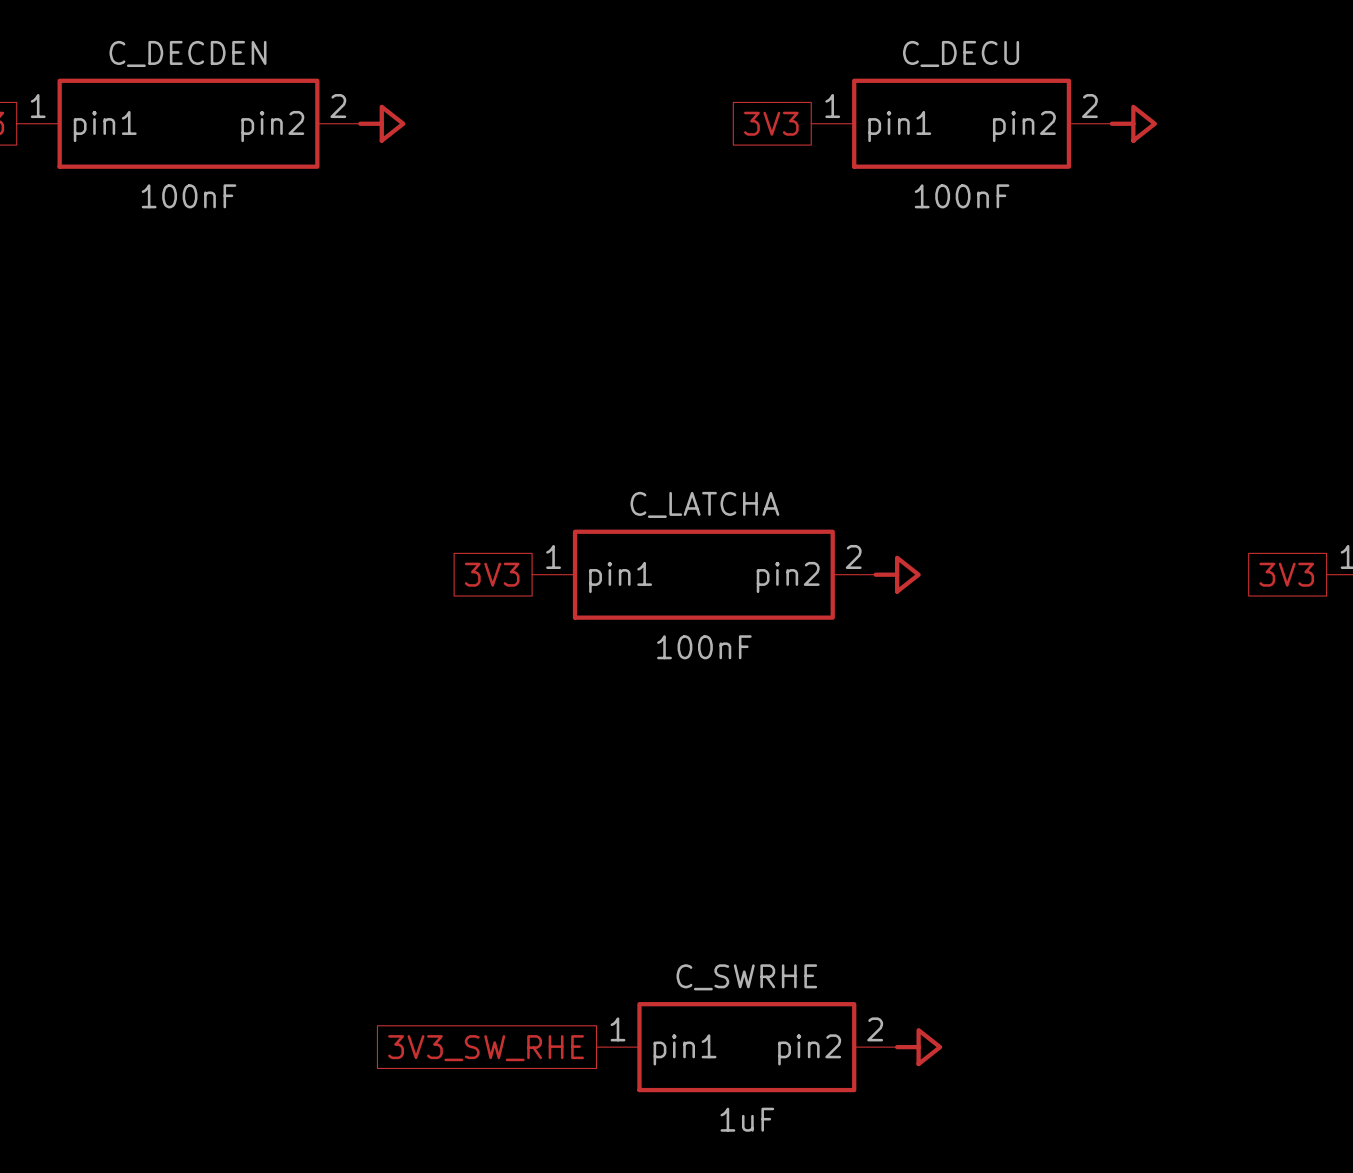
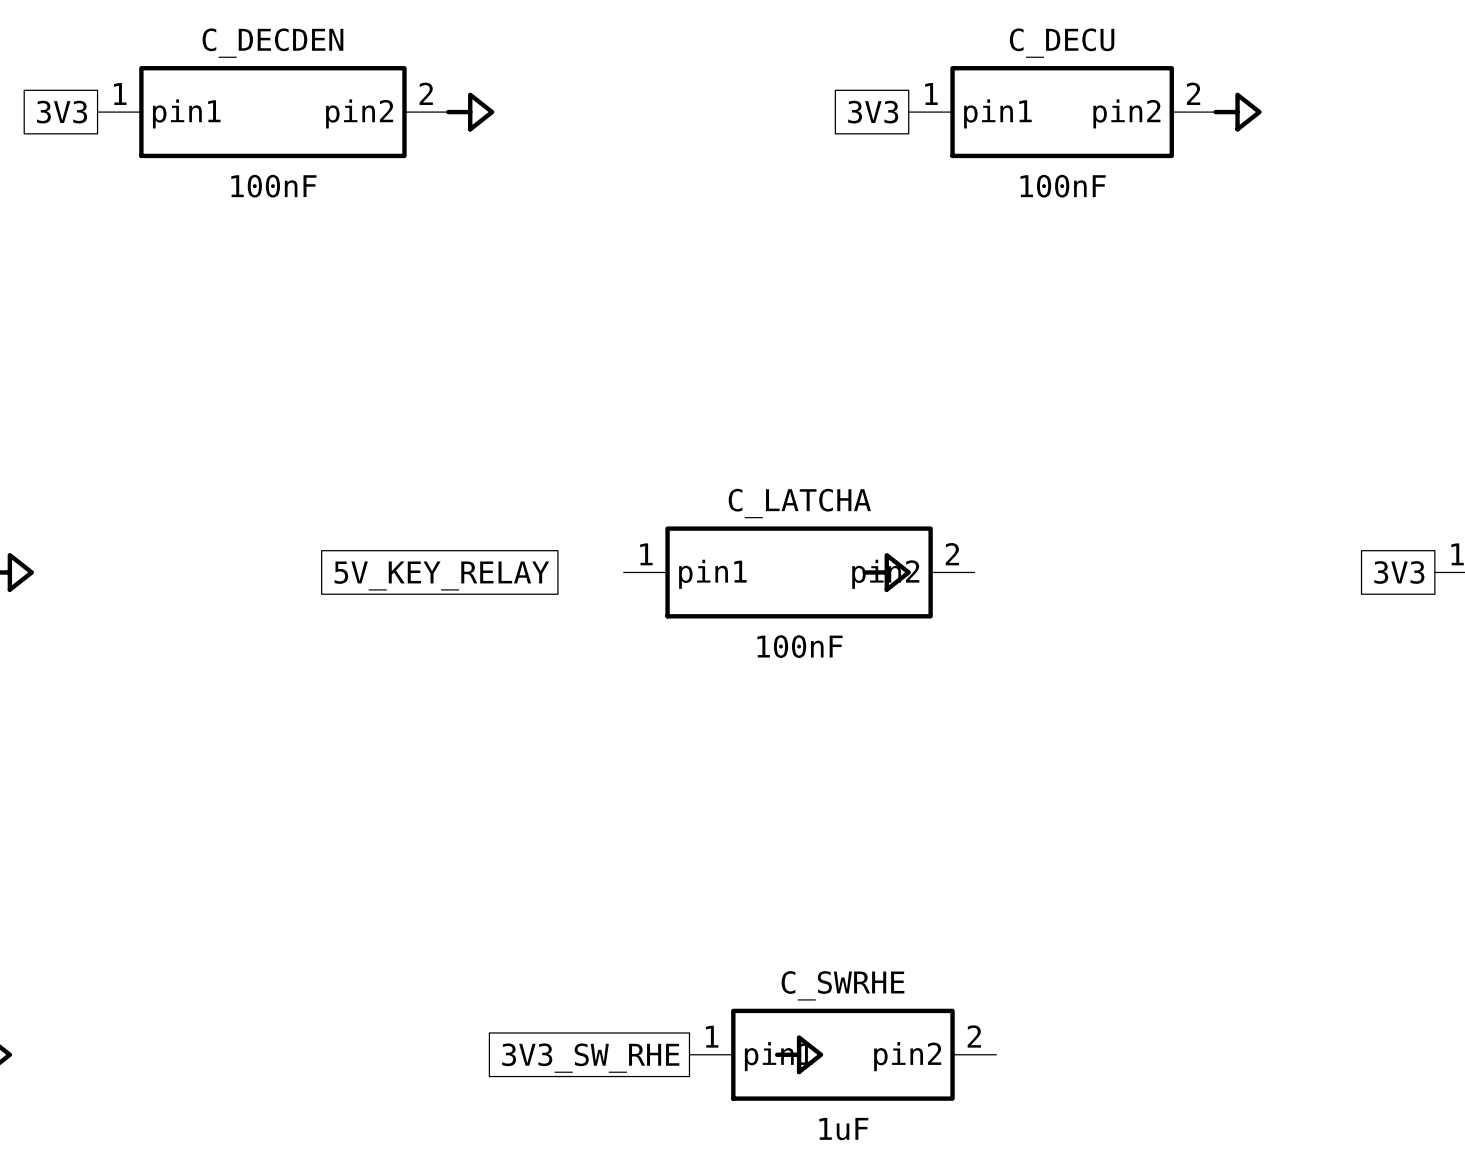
global label: 3V3 (492, 574) -> none
power symbol position: (897, 574) -> (886, 572)
global label: none -> 5V_KEY_RELAY (441, 576)
power symbol position: (918, 1047) -> (799, 1054)

